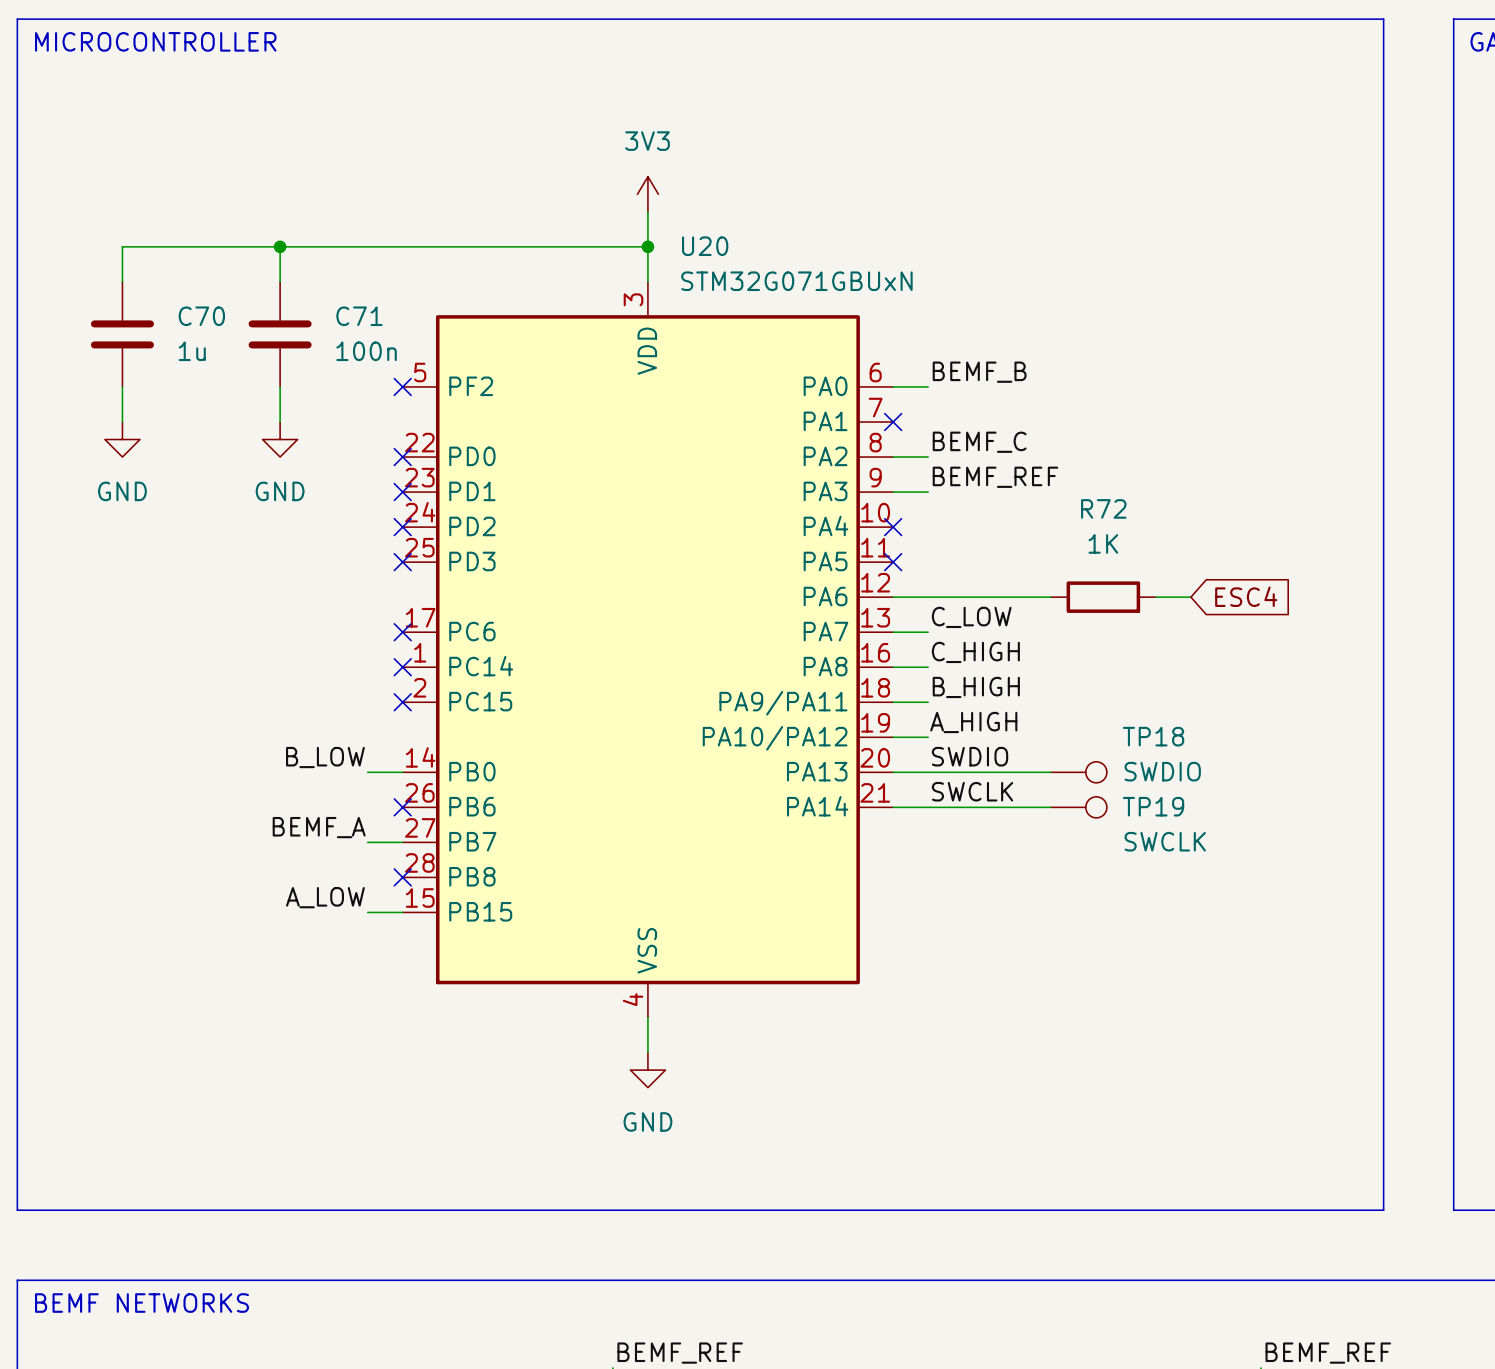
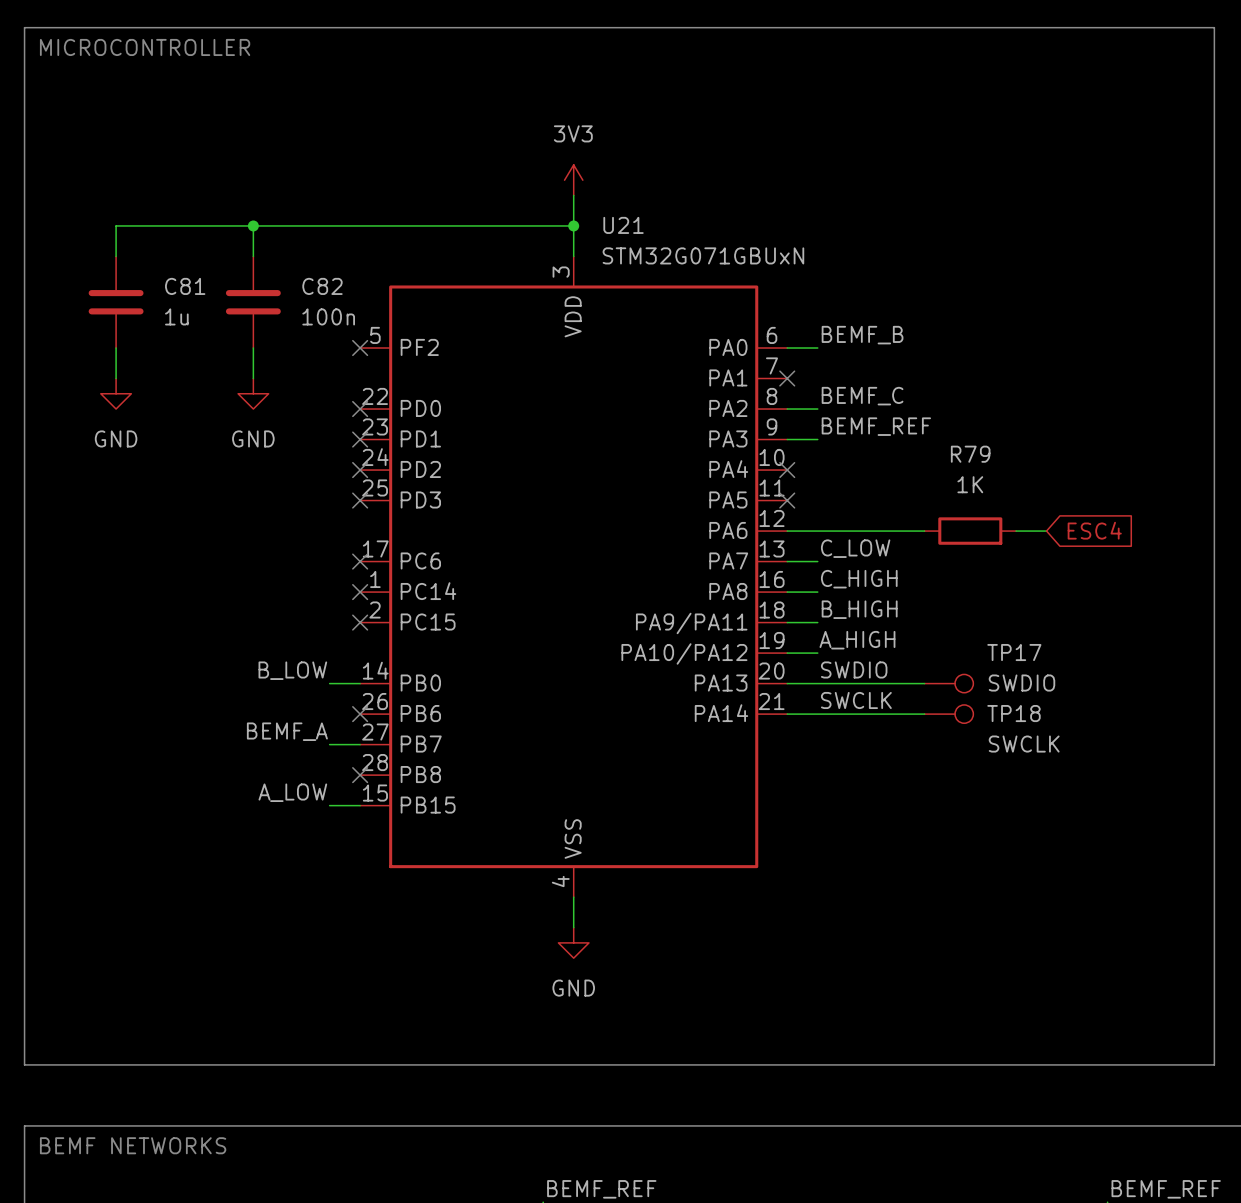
U20 name: U20 (705, 246) -> U21 (623, 225)
C70 name: C70 (201, 316) -> C81 (185, 286)
C71 name: C71 (359, 316) -> C82 (322, 286)
R72 name: R72 (1103, 508) -> R79 (970, 454)
TP18 name: TP18 (1153, 736) -> TP17 (1014, 652)
TP19 name: TP19 (1153, 806) -> TP18 (1014, 713)

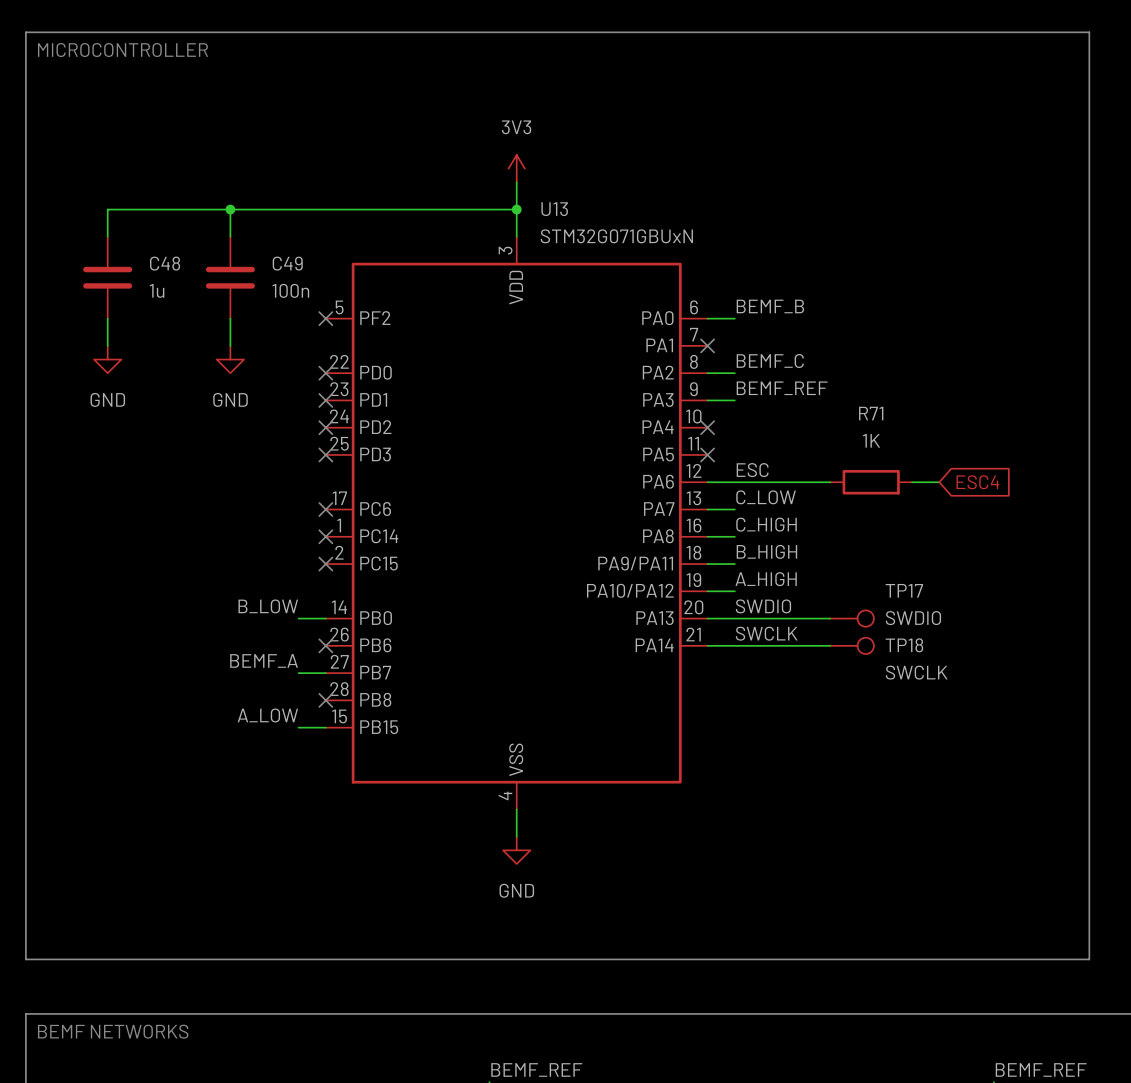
U21 name: U21 (623, 225) -> U13 (554, 209)
C81 name: C81 (185, 286) -> C48 (165, 263)
C82 name: C82 (322, 286) -> C49 (287, 263)
R79 name: R79 (970, 454) -> R71 (871, 413)
label: none -> ESC (752, 470)

